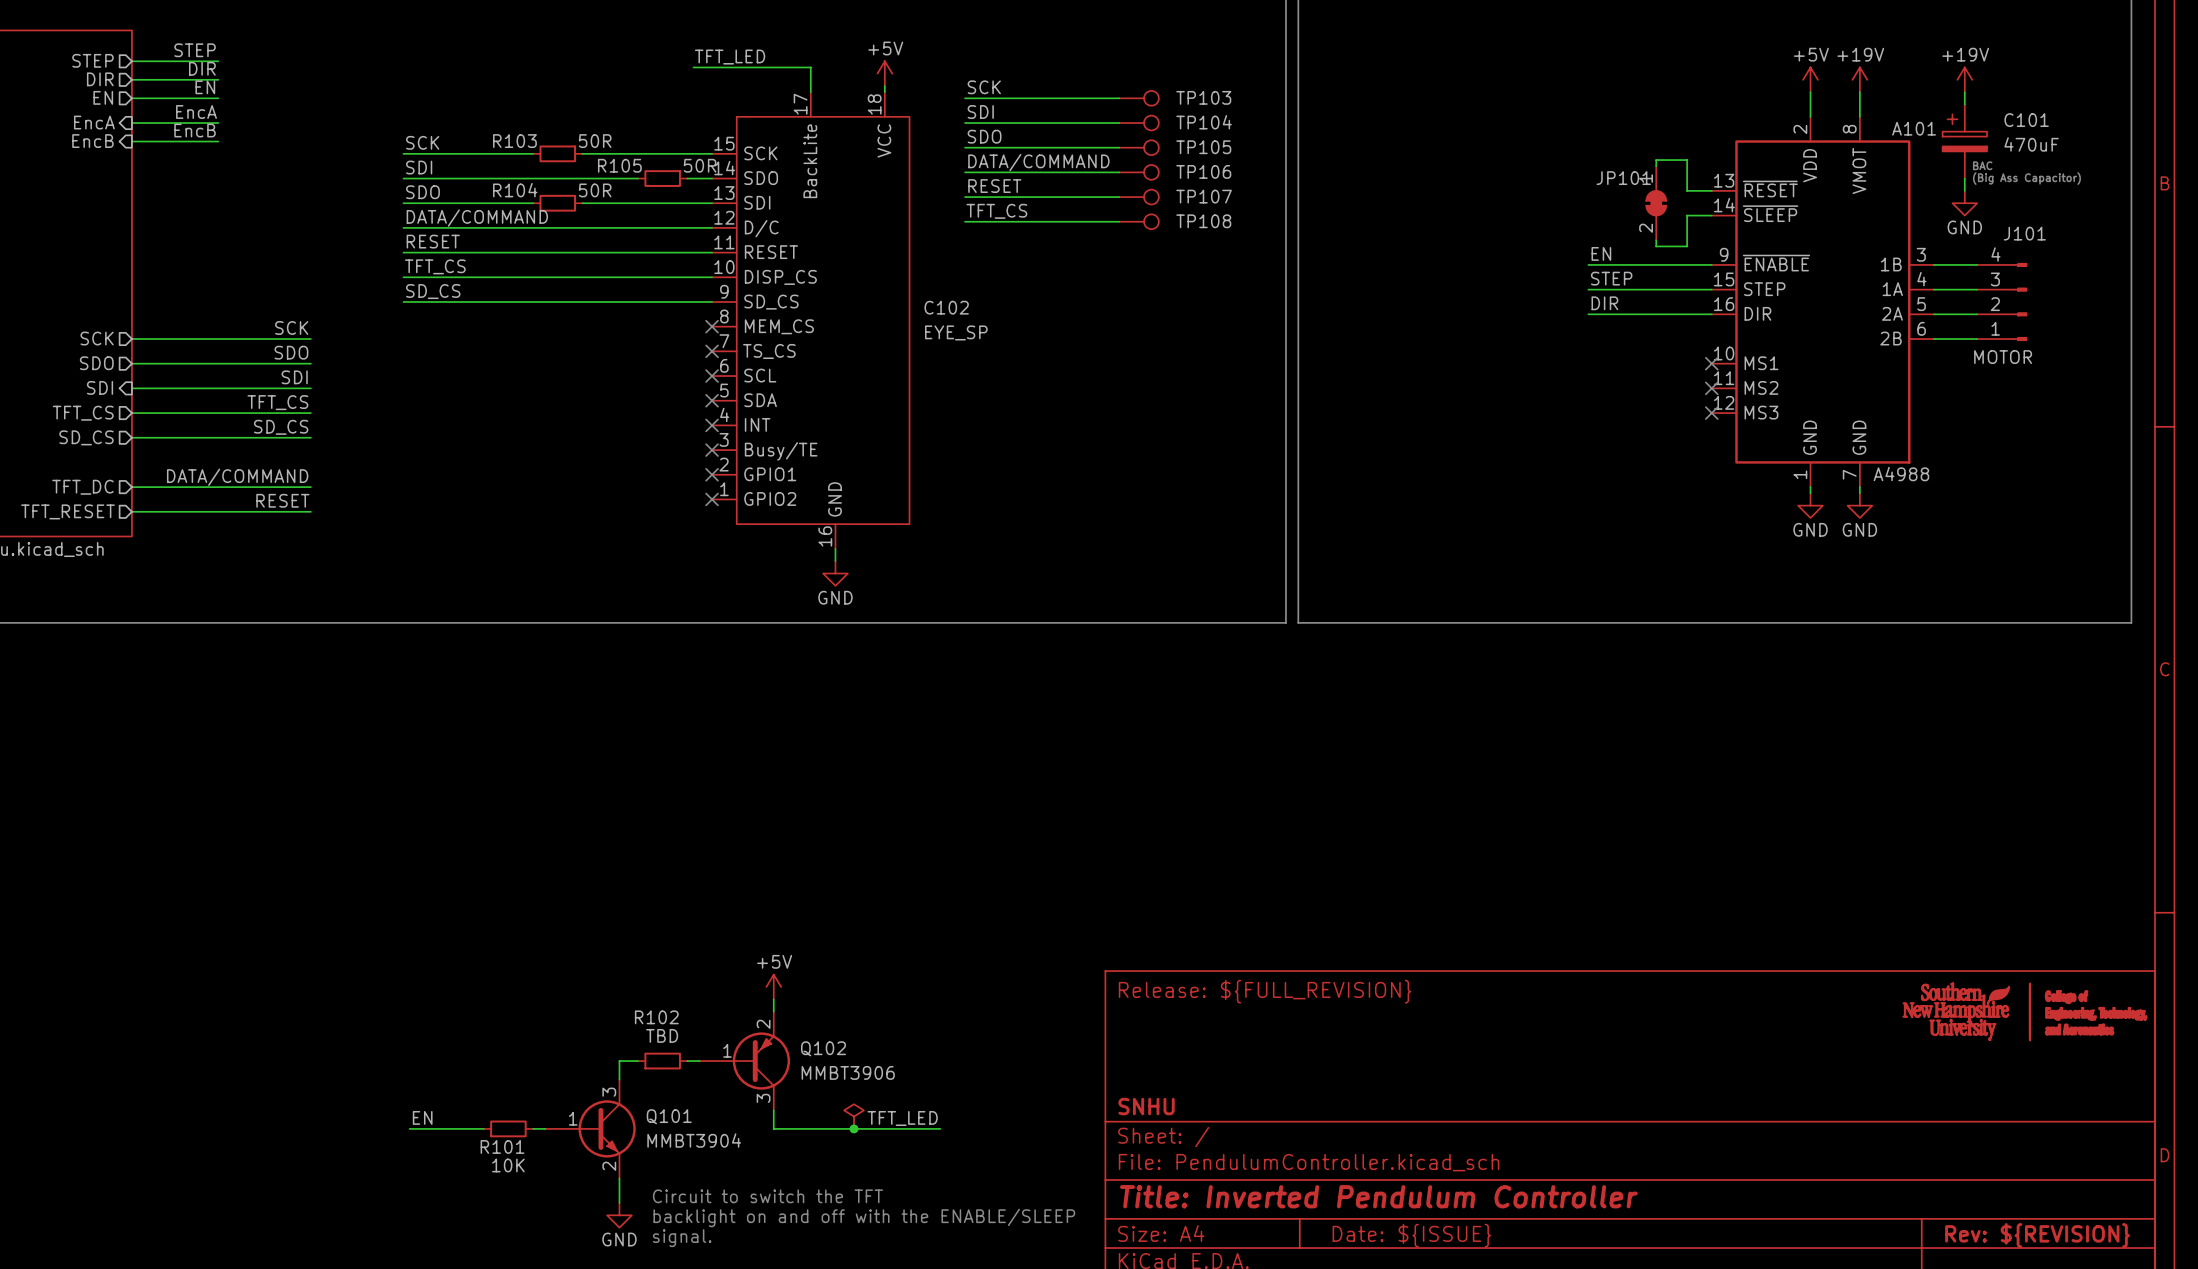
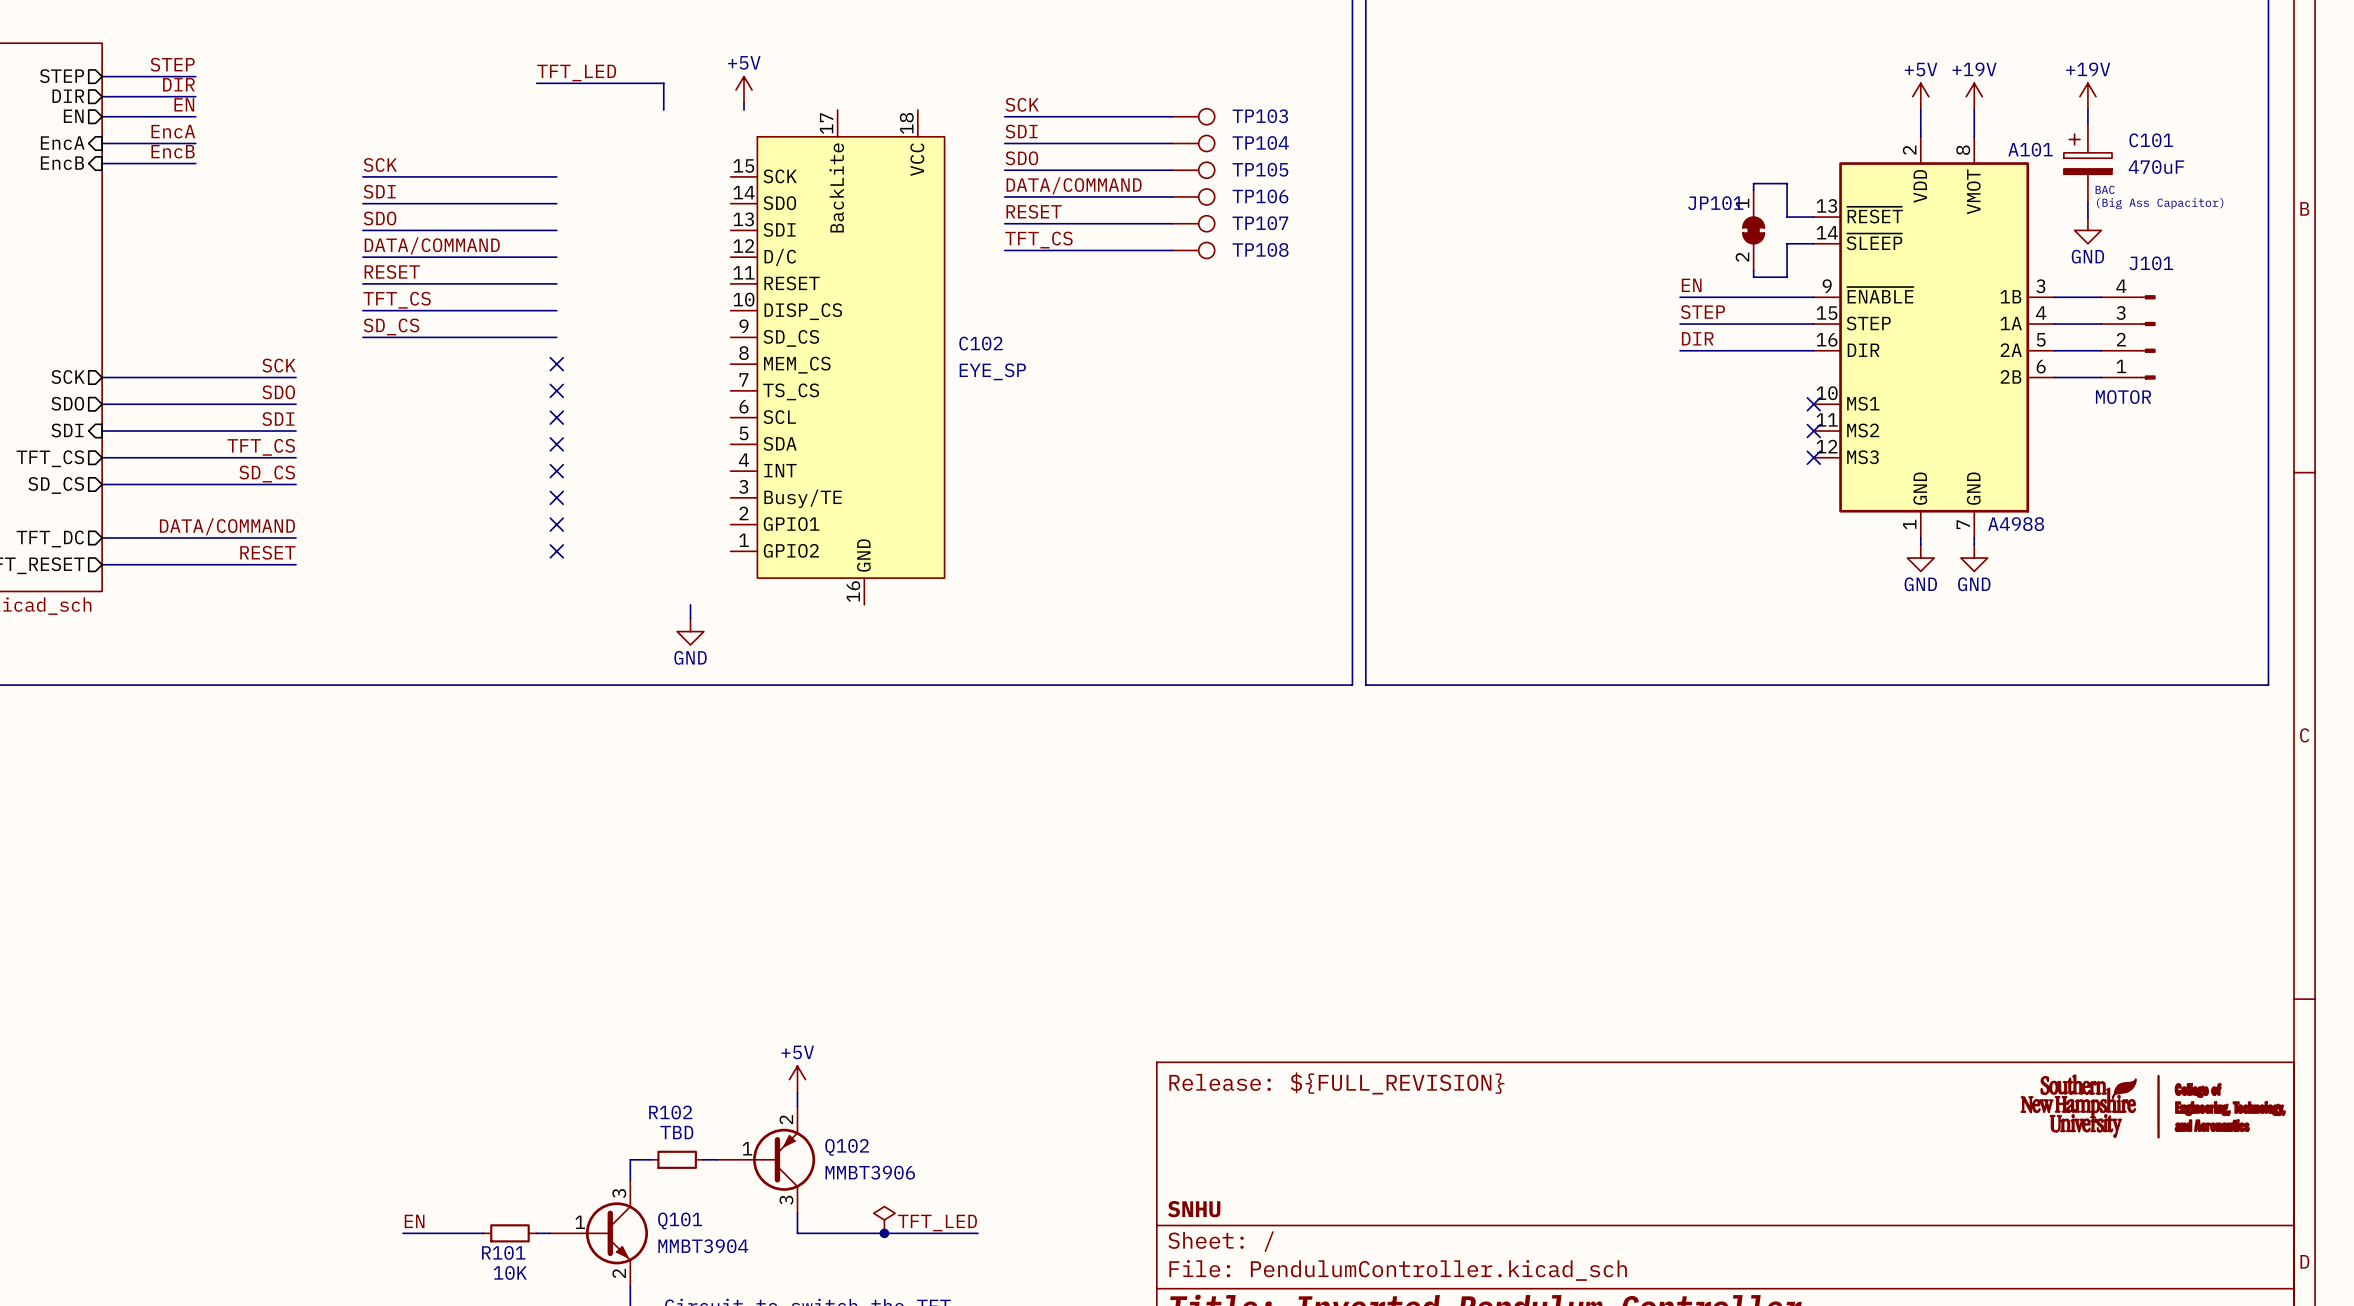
label position: TFT_LED (730, 57) -> TFT_LED (576, 73)
wire: (693, 67) (810, 67) (810, 92) -> (536, 83) (663, 83) (663, 110)
power symbol position: +5V (884, 73) -> +5V (744, 90)
wire: (884, 85) (884, 92) -> (744, 103) (744, 110)
label position: SCK (422, 142) -> SCK (380, 164)
wire: none -> (362, 176) (396, 176)
wire: none -> (536, 176) (556, 176)
R103: 50R (557, 153) -> none
wire: (582, 153) (712, 153) -> none
label position: SDI (419, 167) -> SDI (379, 191)
wire: none -> (362, 203) (396, 203)
wire: (551, 178) (637, 178) -> none
R105: 50R (662, 178) -> none
wire: (687, 178) (712, 178) -> none
label position: SDO (422, 192) -> SDO (380, 218)
wire: none -> (362, 230) (396, 230)
wire: none -> (536, 230) (556, 230)
R104: 50R (557, 203) -> none
wire: (582, 203) (712, 203) -> none
label position: DATA/COMMAND (477, 218) -> DATA/COMMAND (432, 245)
wire: none -> (362, 257) (396, 257)
wire: (551, 227) (712, 227) -> none
label position: RESET (433, 241) -> RESET (392, 271)
wire: none -> (362, 283) (396, 283)
wire: (551, 252) (712, 252) -> none
label position: TFT_CS (435, 266) -> TFT_CS (397, 300)
wire: none -> (362, 310) (396, 310)
wire: (551, 277) (712, 277) -> none
label position: SD_CS (433, 291) -> SD_CS (391, 326)
wire: none -> (362, 337) (396, 337)
wire: (551, 301) (712, 301) -> none
no-connect mark: none -> (556, 364)
no-connect mark: (712, 326) -> none
no-connect mark: none -> (556, 390)
no-connect mark: (712, 351) -> none
no-connect mark: none -> (556, 417)
no-connect mark: (712, 376) -> none
no-connect mark: none -> (556, 444)
no-connect mark: (712, 400) -> none
no-connect mark: none -> (556, 471)
no-connect mark: (712, 425) -> none
no-connect mark: none -> (556, 497)
no-connect mark: (712, 450) -> none
no-connect mark: none -> (556, 524)
no-connect mark: (712, 474) -> none
no-connect mark: none -> (556, 551)
no-connect mark: (712, 499) -> none
wire: (835, 548) (835, 561) -> (690, 604) (690, 618)
power symbol position: GND (835, 573) -> GND (690, 631)

